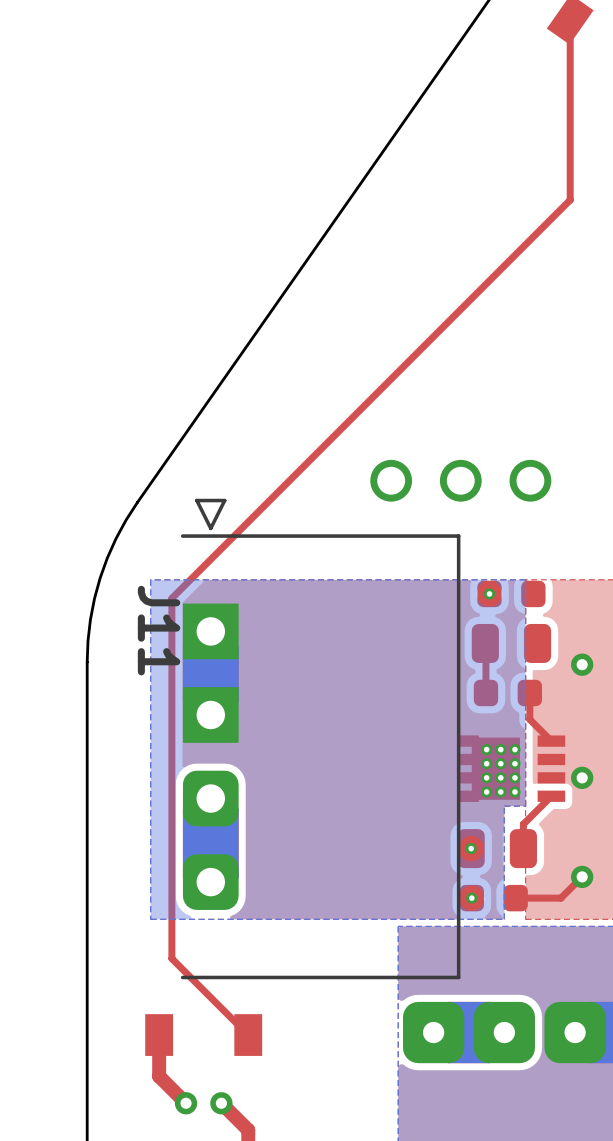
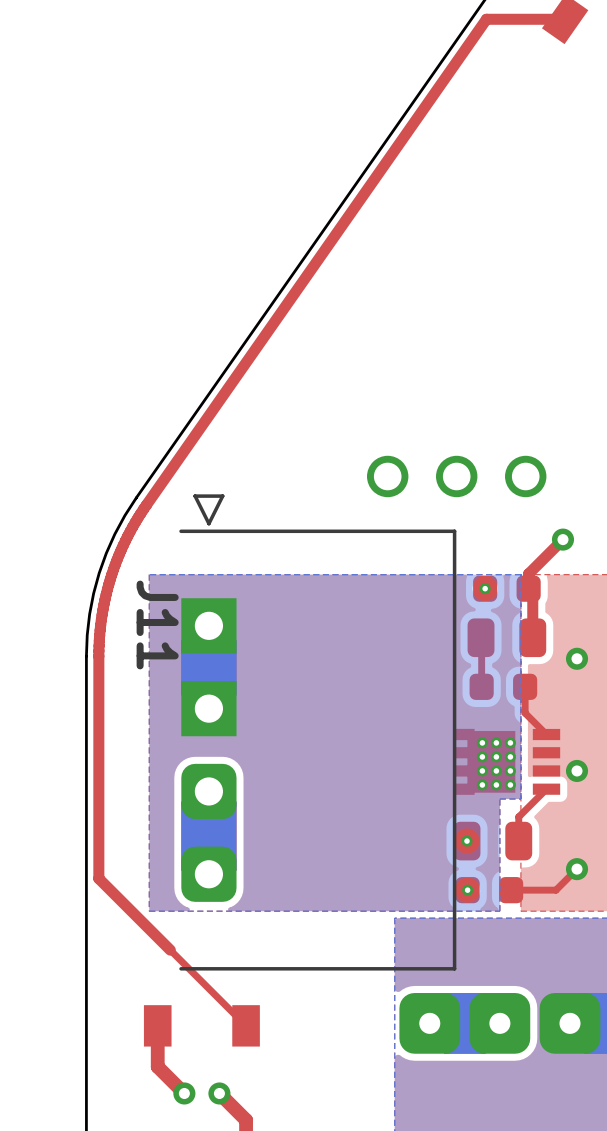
top track: (570, 19) (570, 200) (171, 598) (171, 958) -> (565, 19) (486, 19) (146, 504) (132, 526) (119, 554) (105, 599) (99, 640) (98, 878) (170, 950)
top track: none -> (562, 539) (528, 573) (528, 588) (532, 592) (532, 637)
via: none -> (562, 539)

